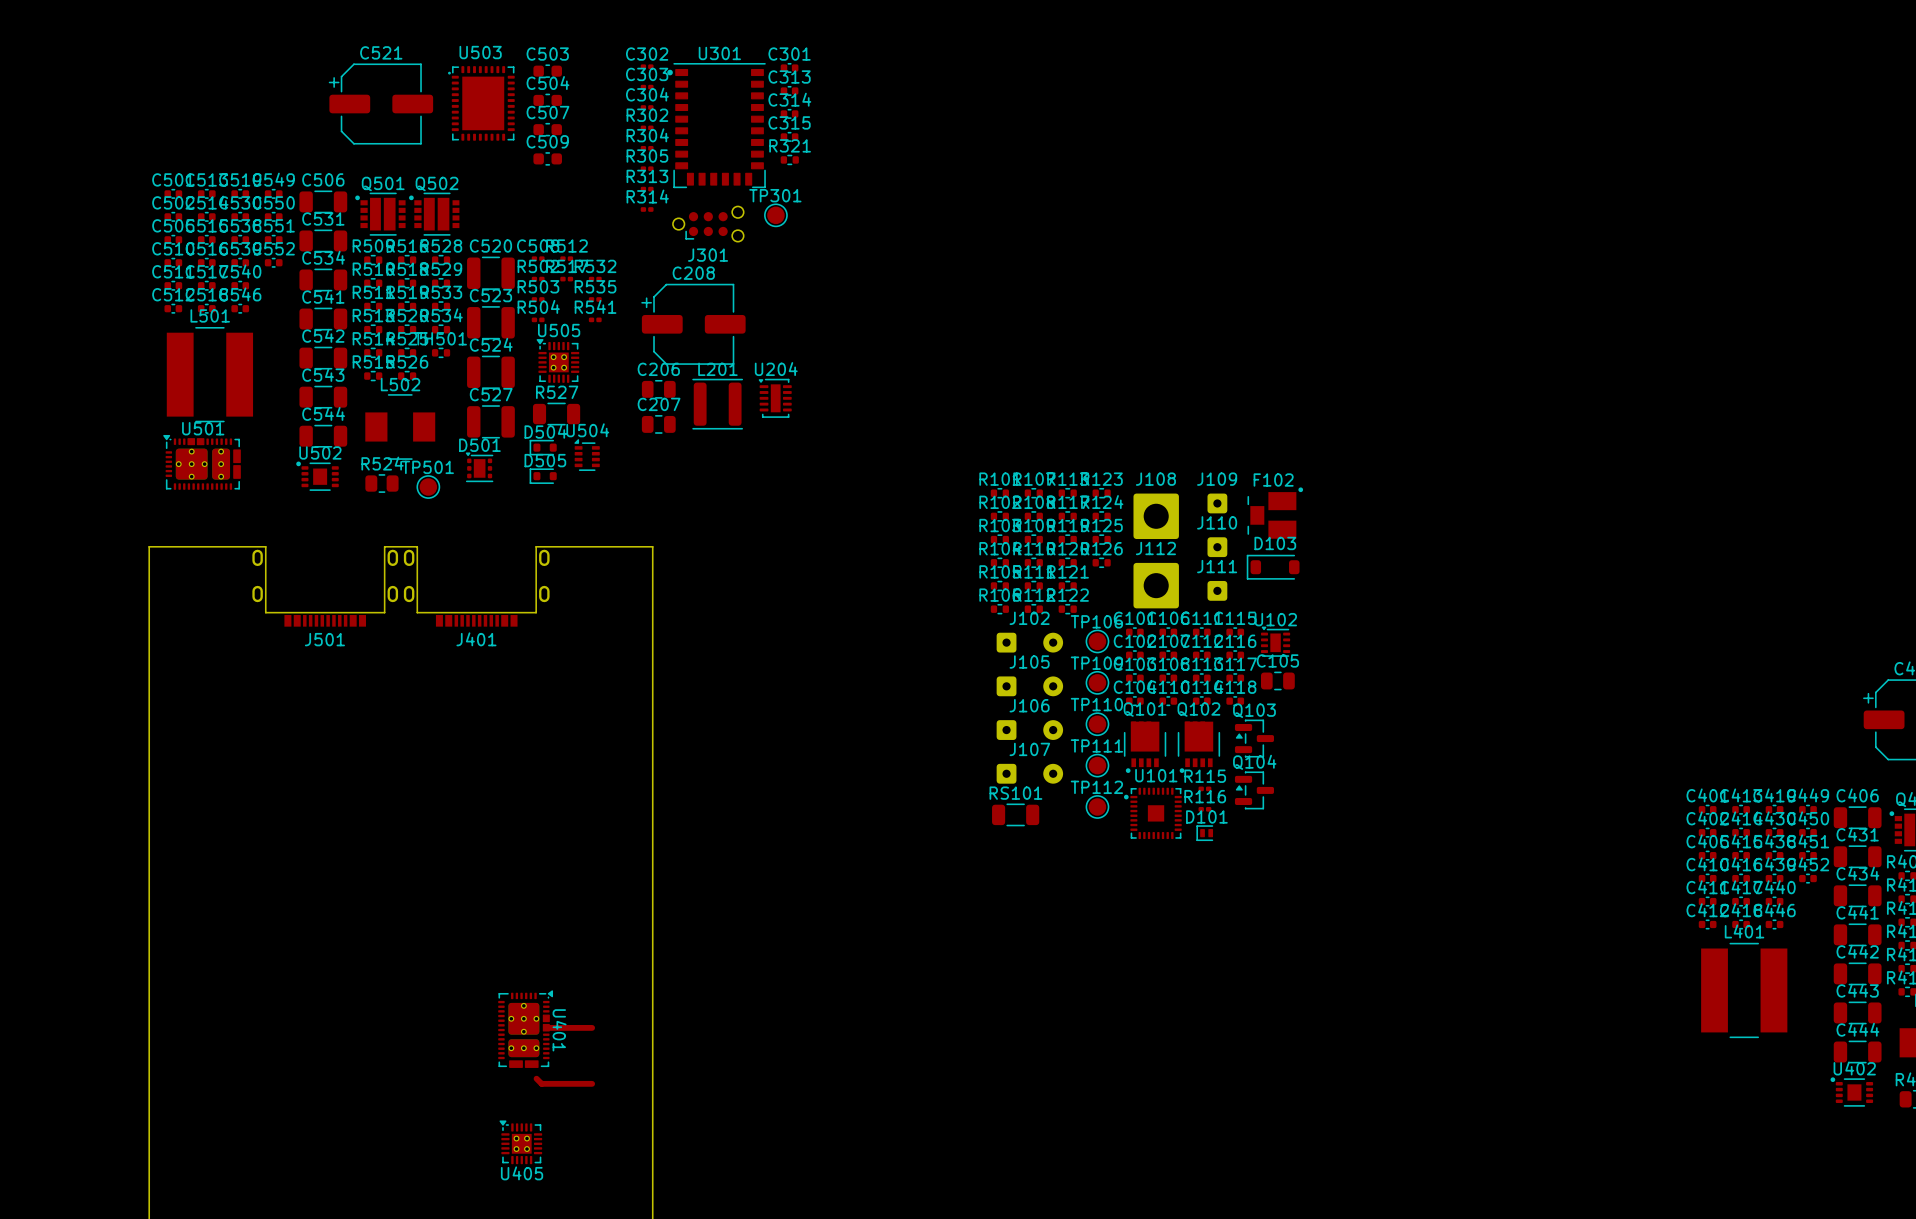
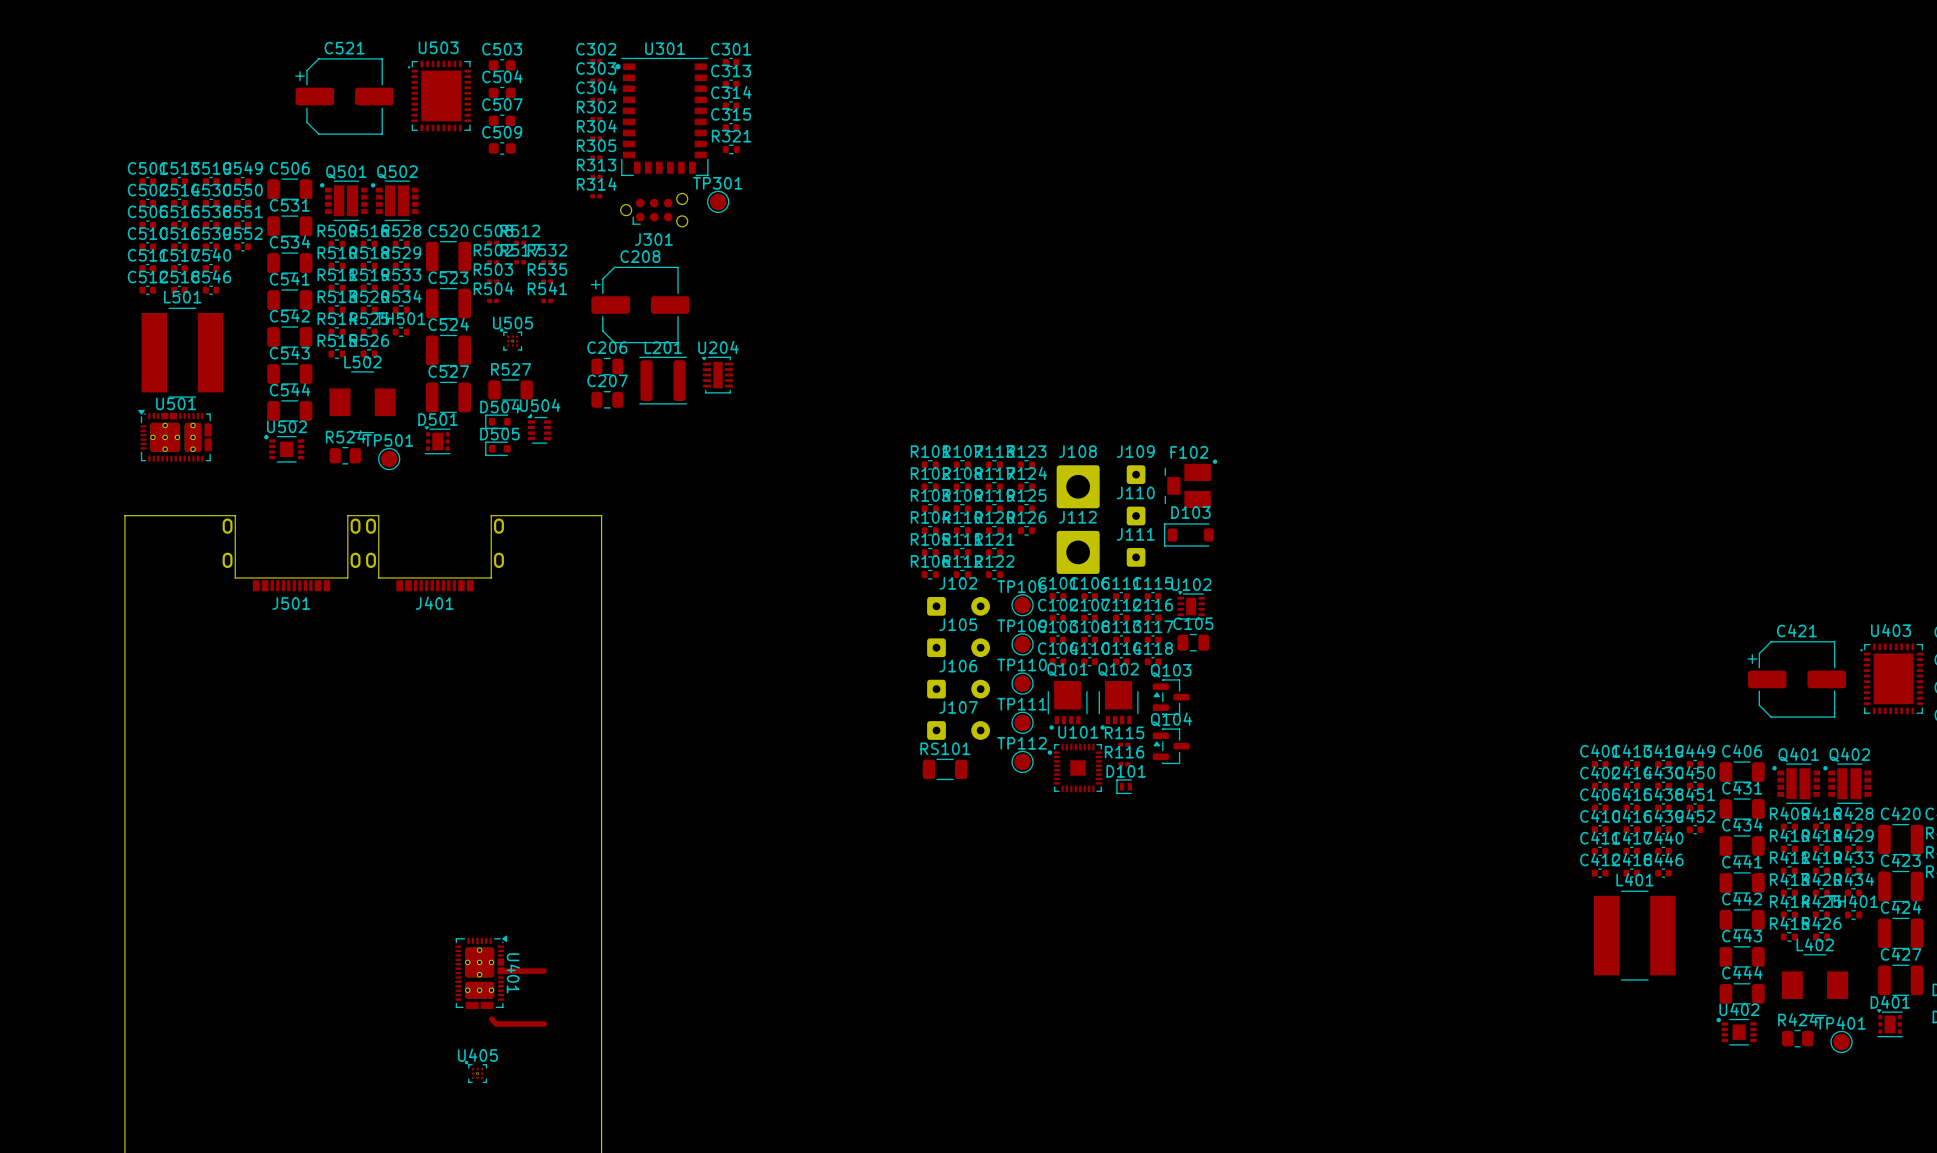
U505 footprint: [536, 339, 580, 383] -> [499, 328, 523, 351]
U405 footprint: [499, 1120, 543, 1165] -> [464, 1060, 488, 1084]
U405 name position: U405 (522, 1173) -> U405 (477, 1055)

